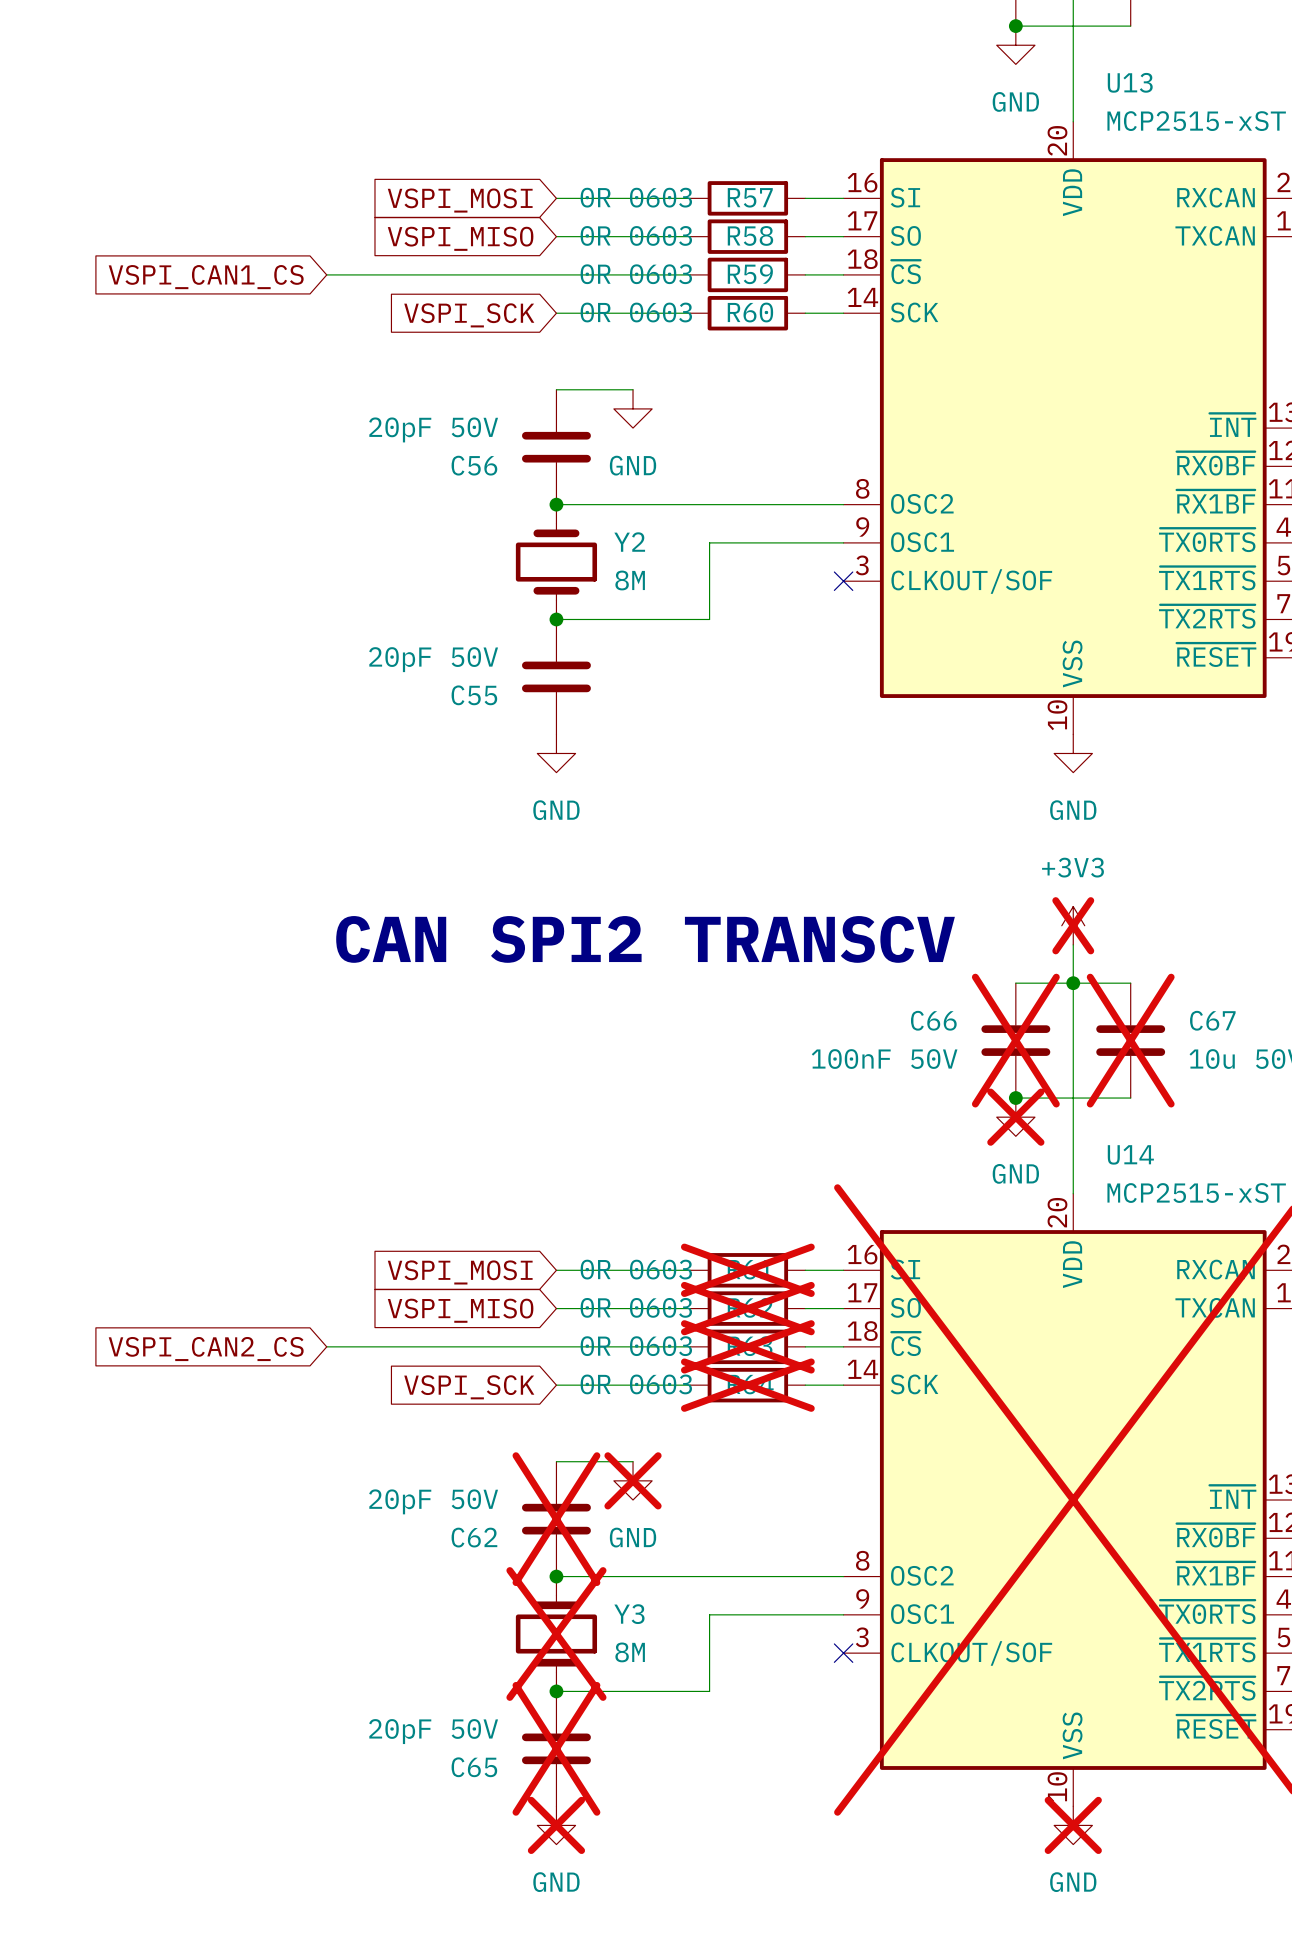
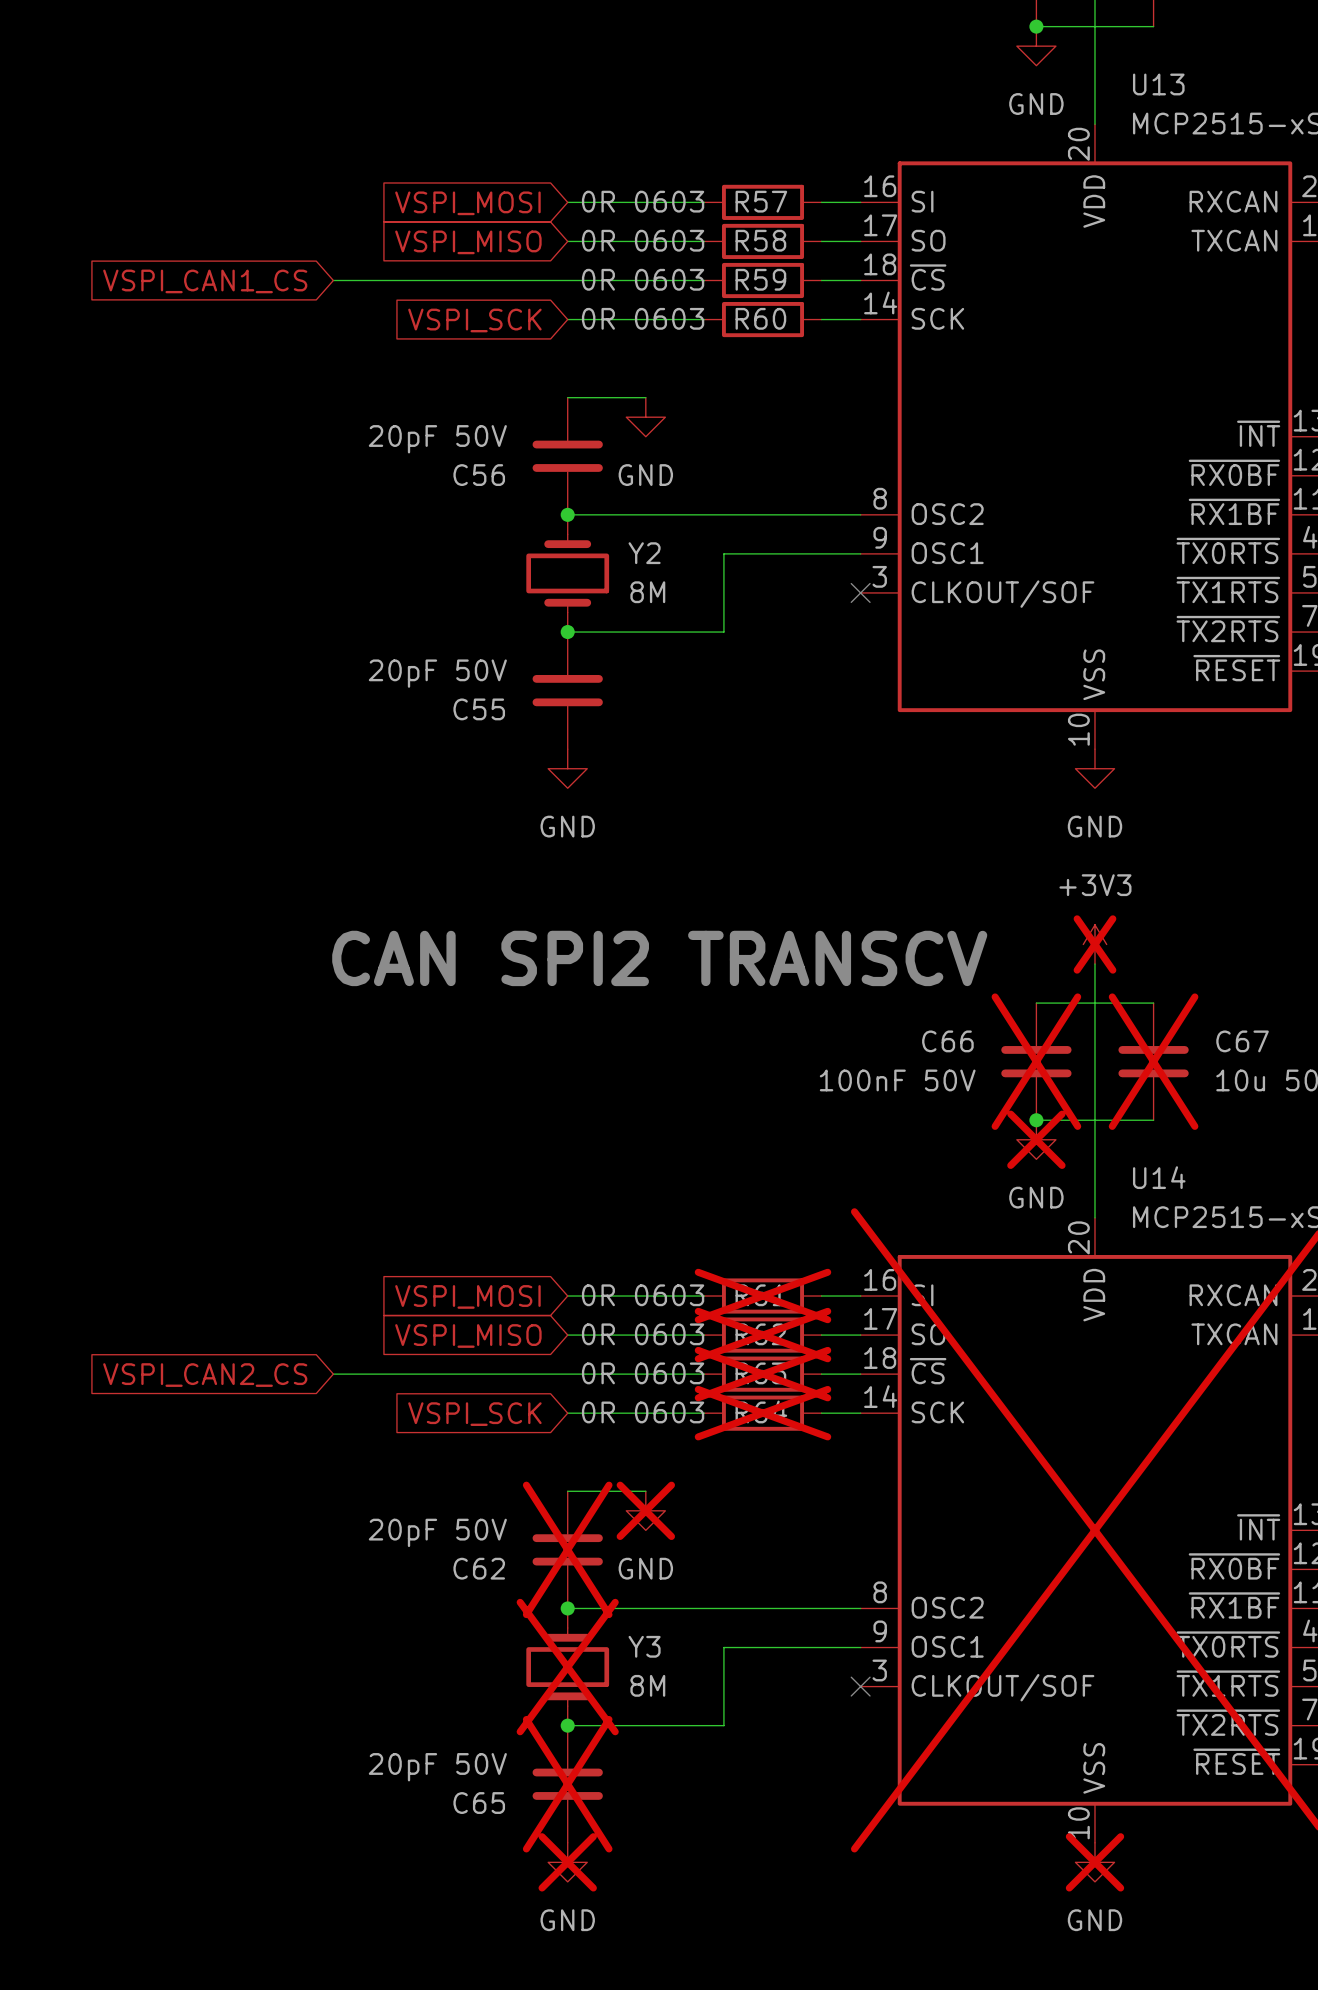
junction: (1073, 983) -> none

